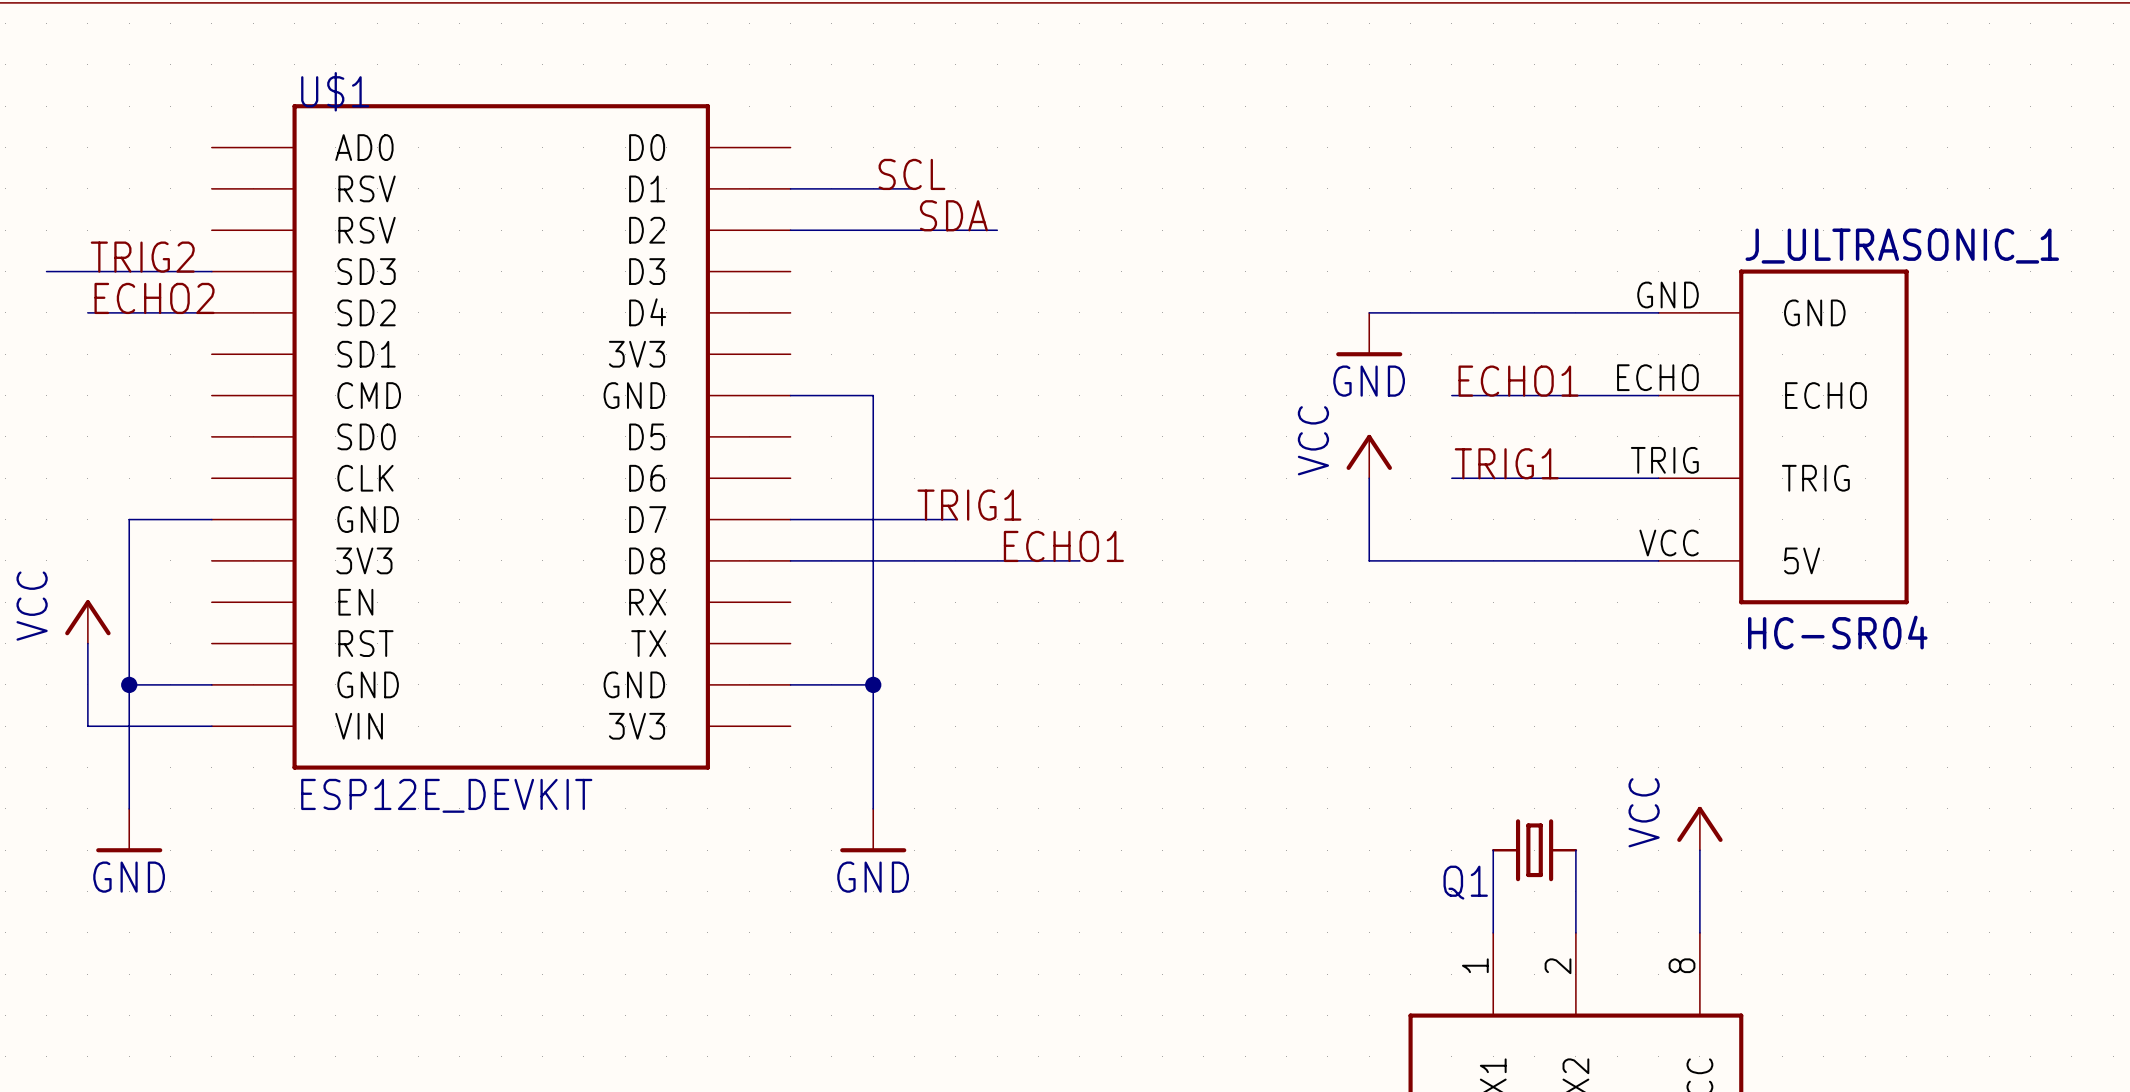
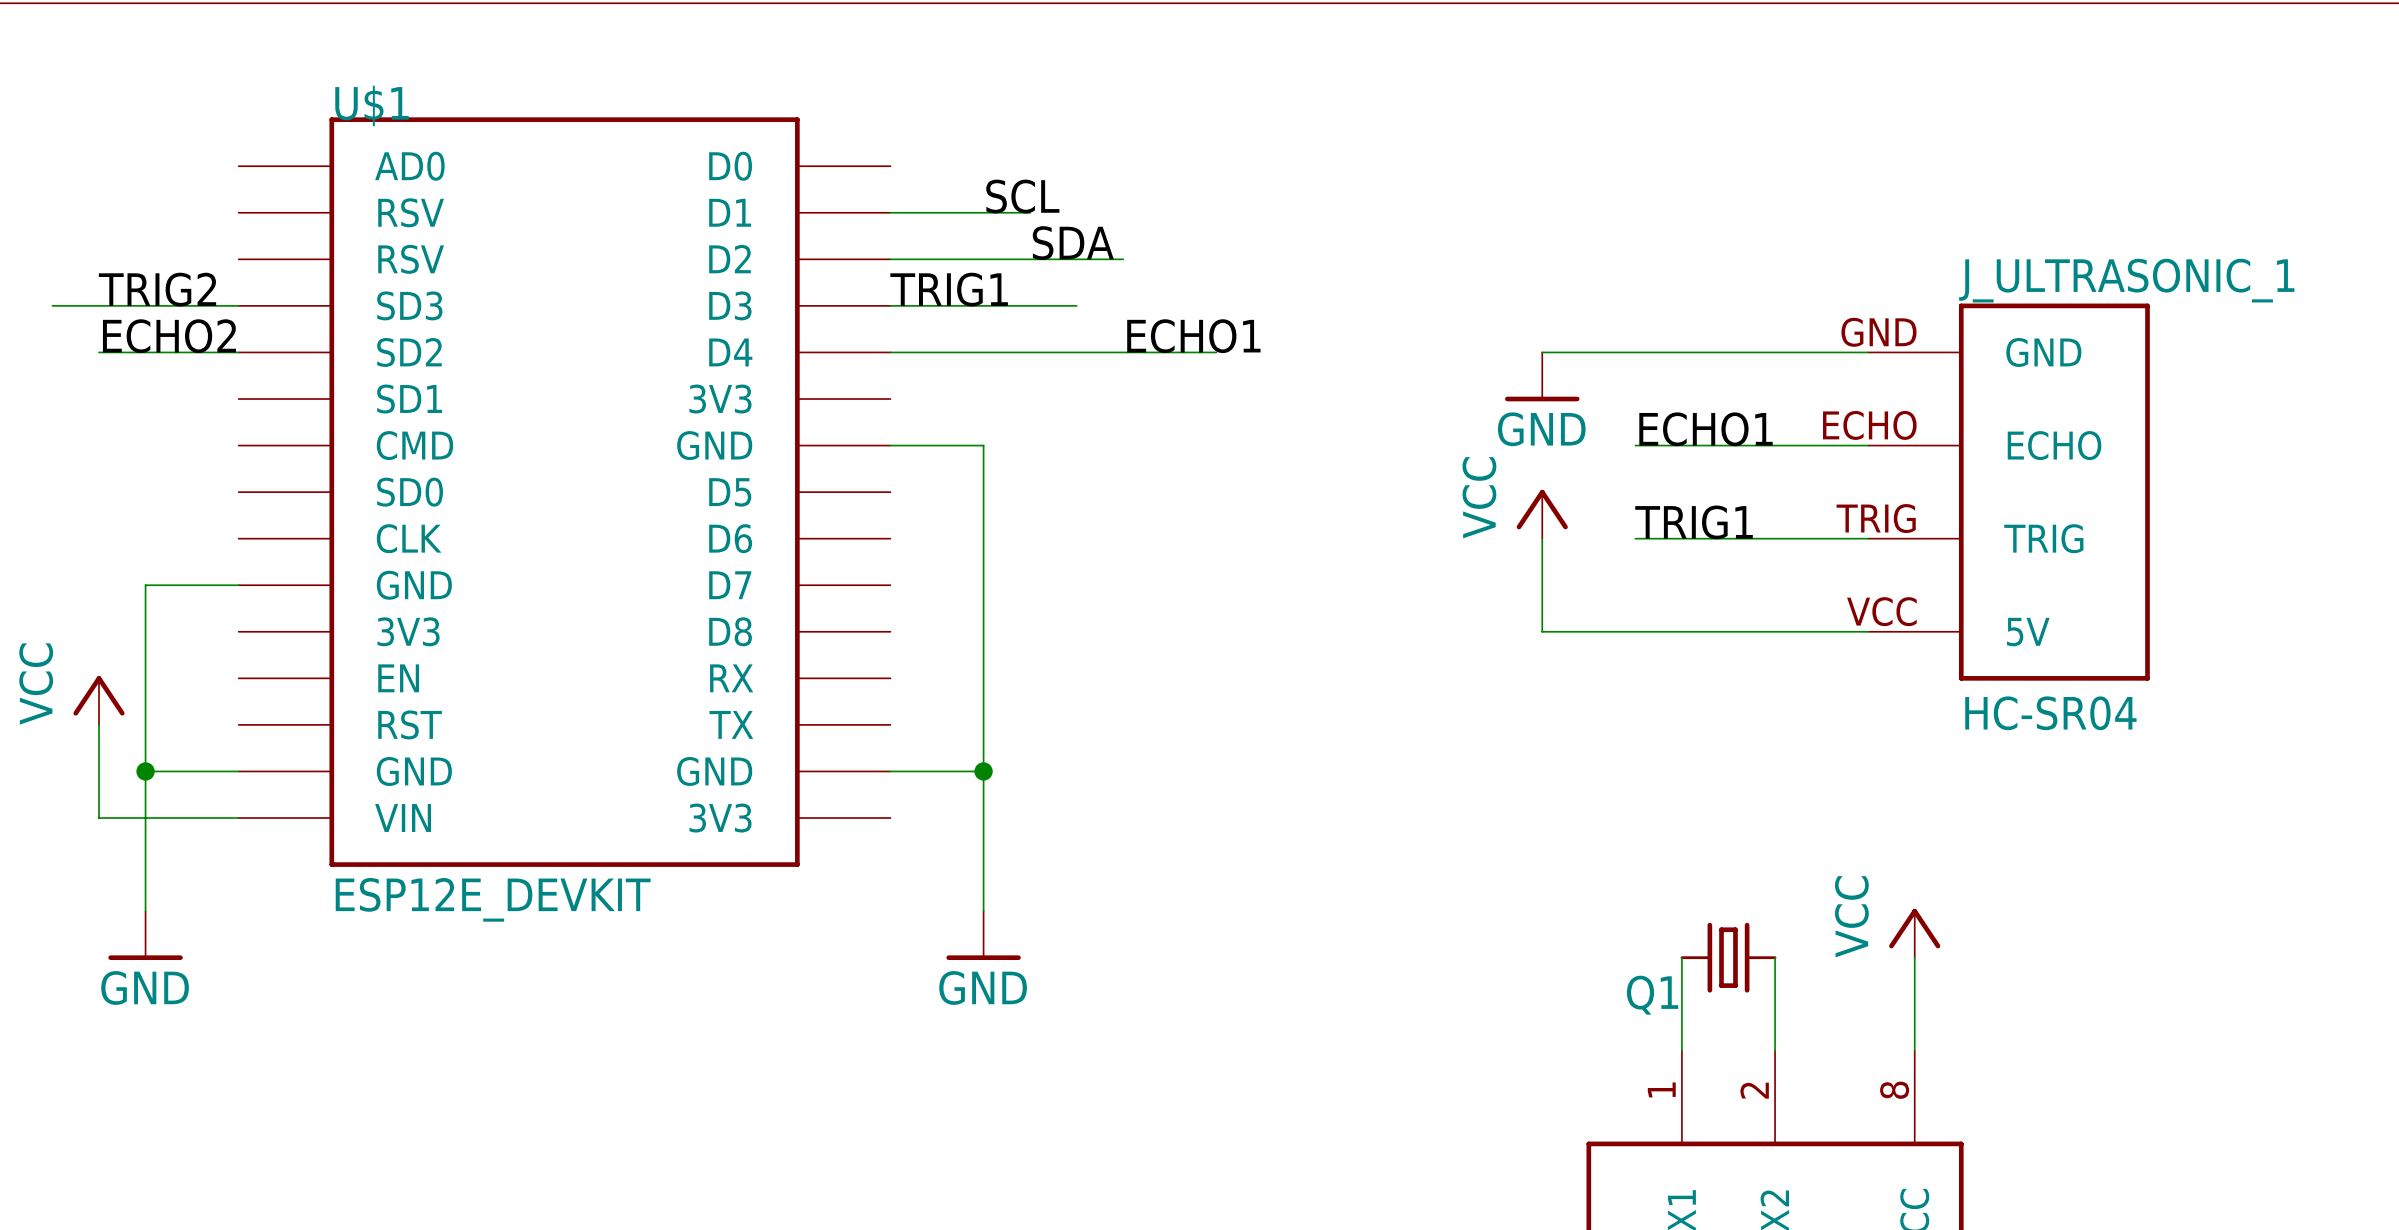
label position: TRIG1 (969, 505) -> TRIG1 (949, 289)
wire: (790, 519) (955, 519) -> (890, 305) (1076, 305)
label position: ECHO1 (1063, 546) -> ECHO1 (1193, 336)
wire: (790, 560) (1079, 560) -> (890, 352) (1216, 352)

